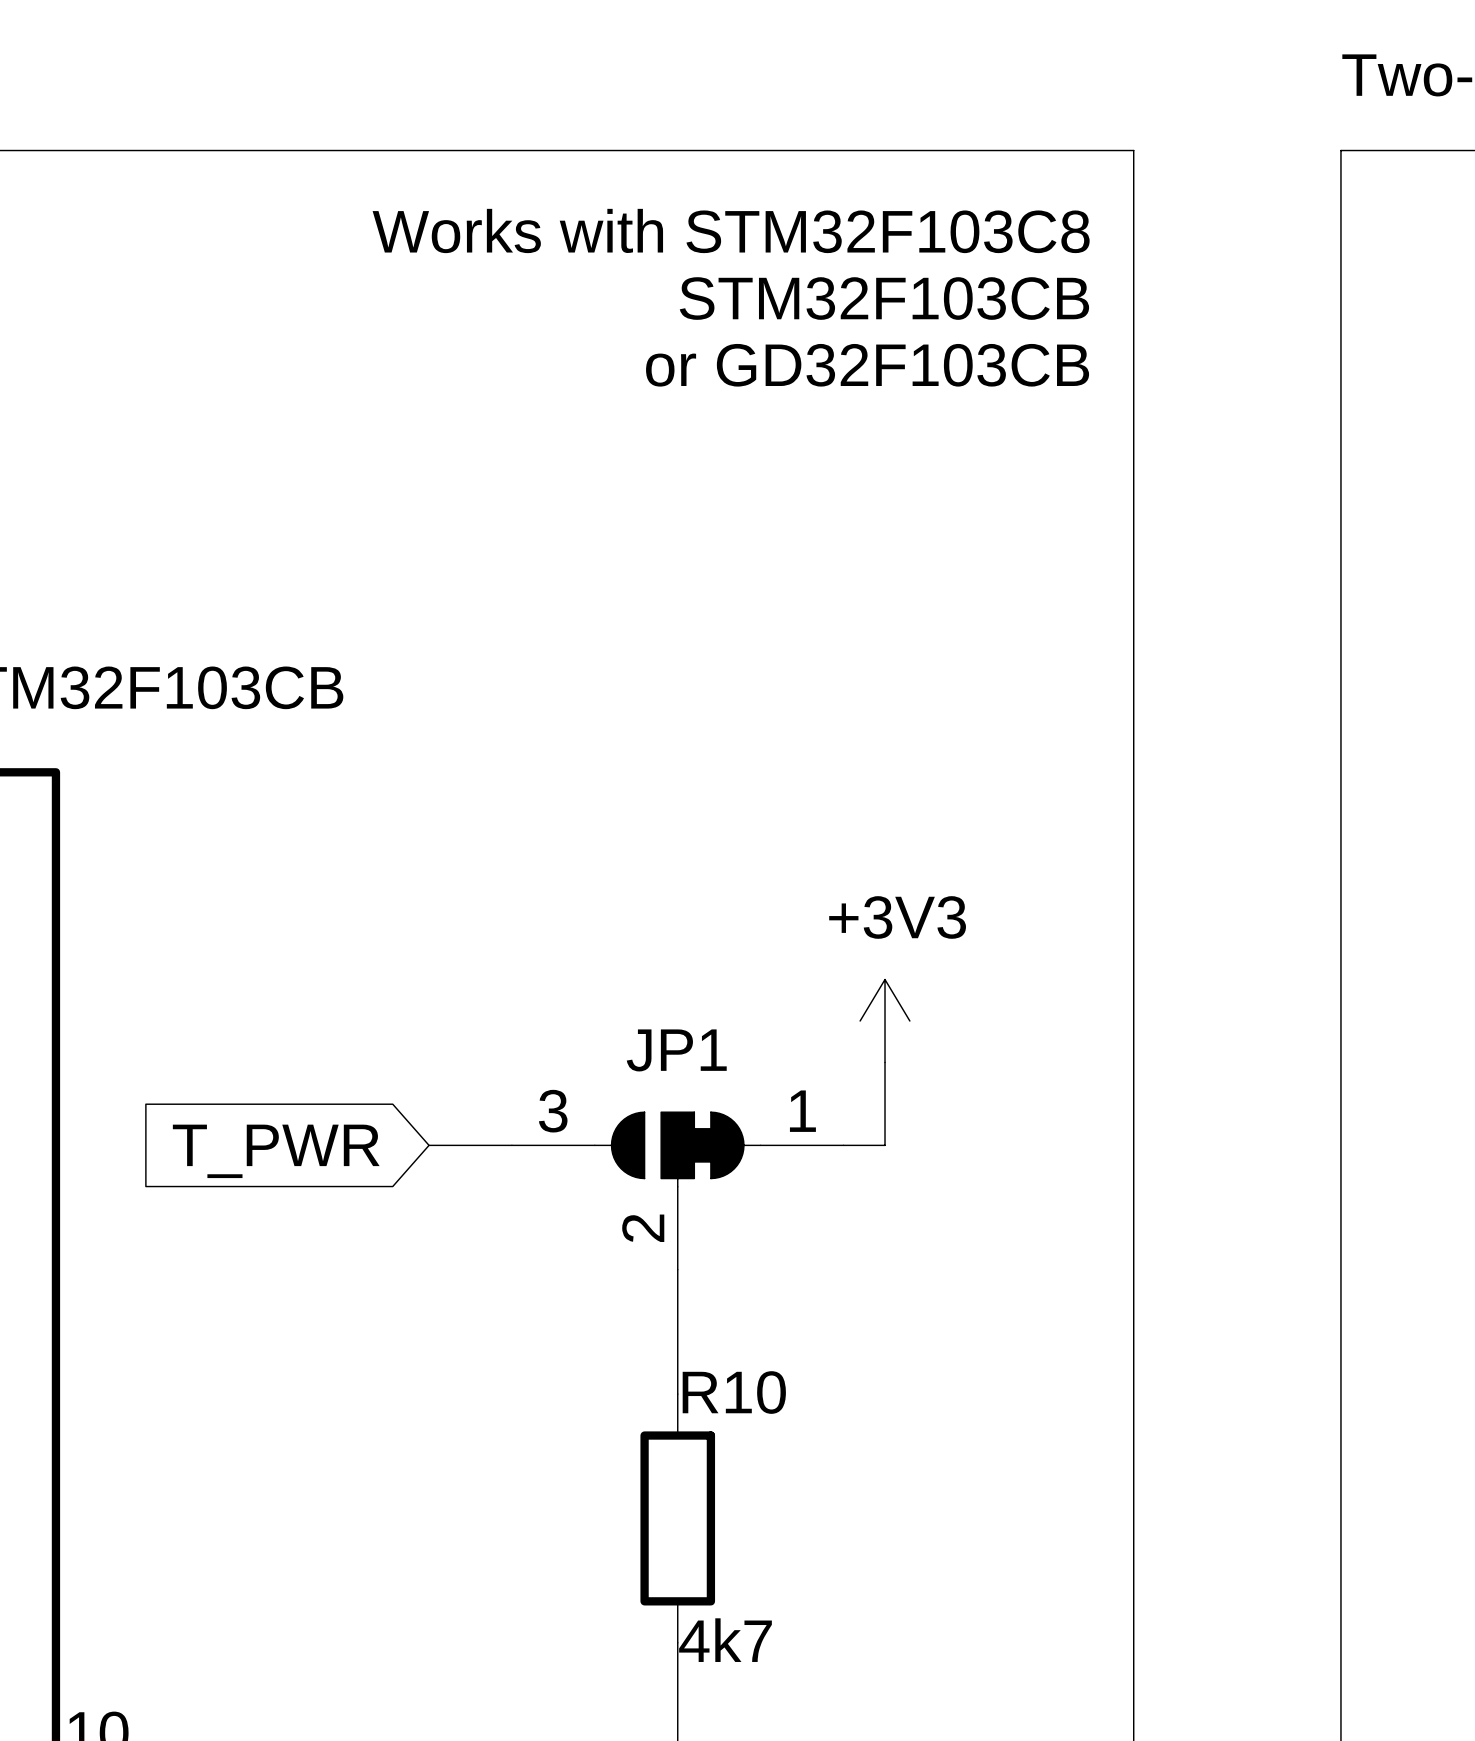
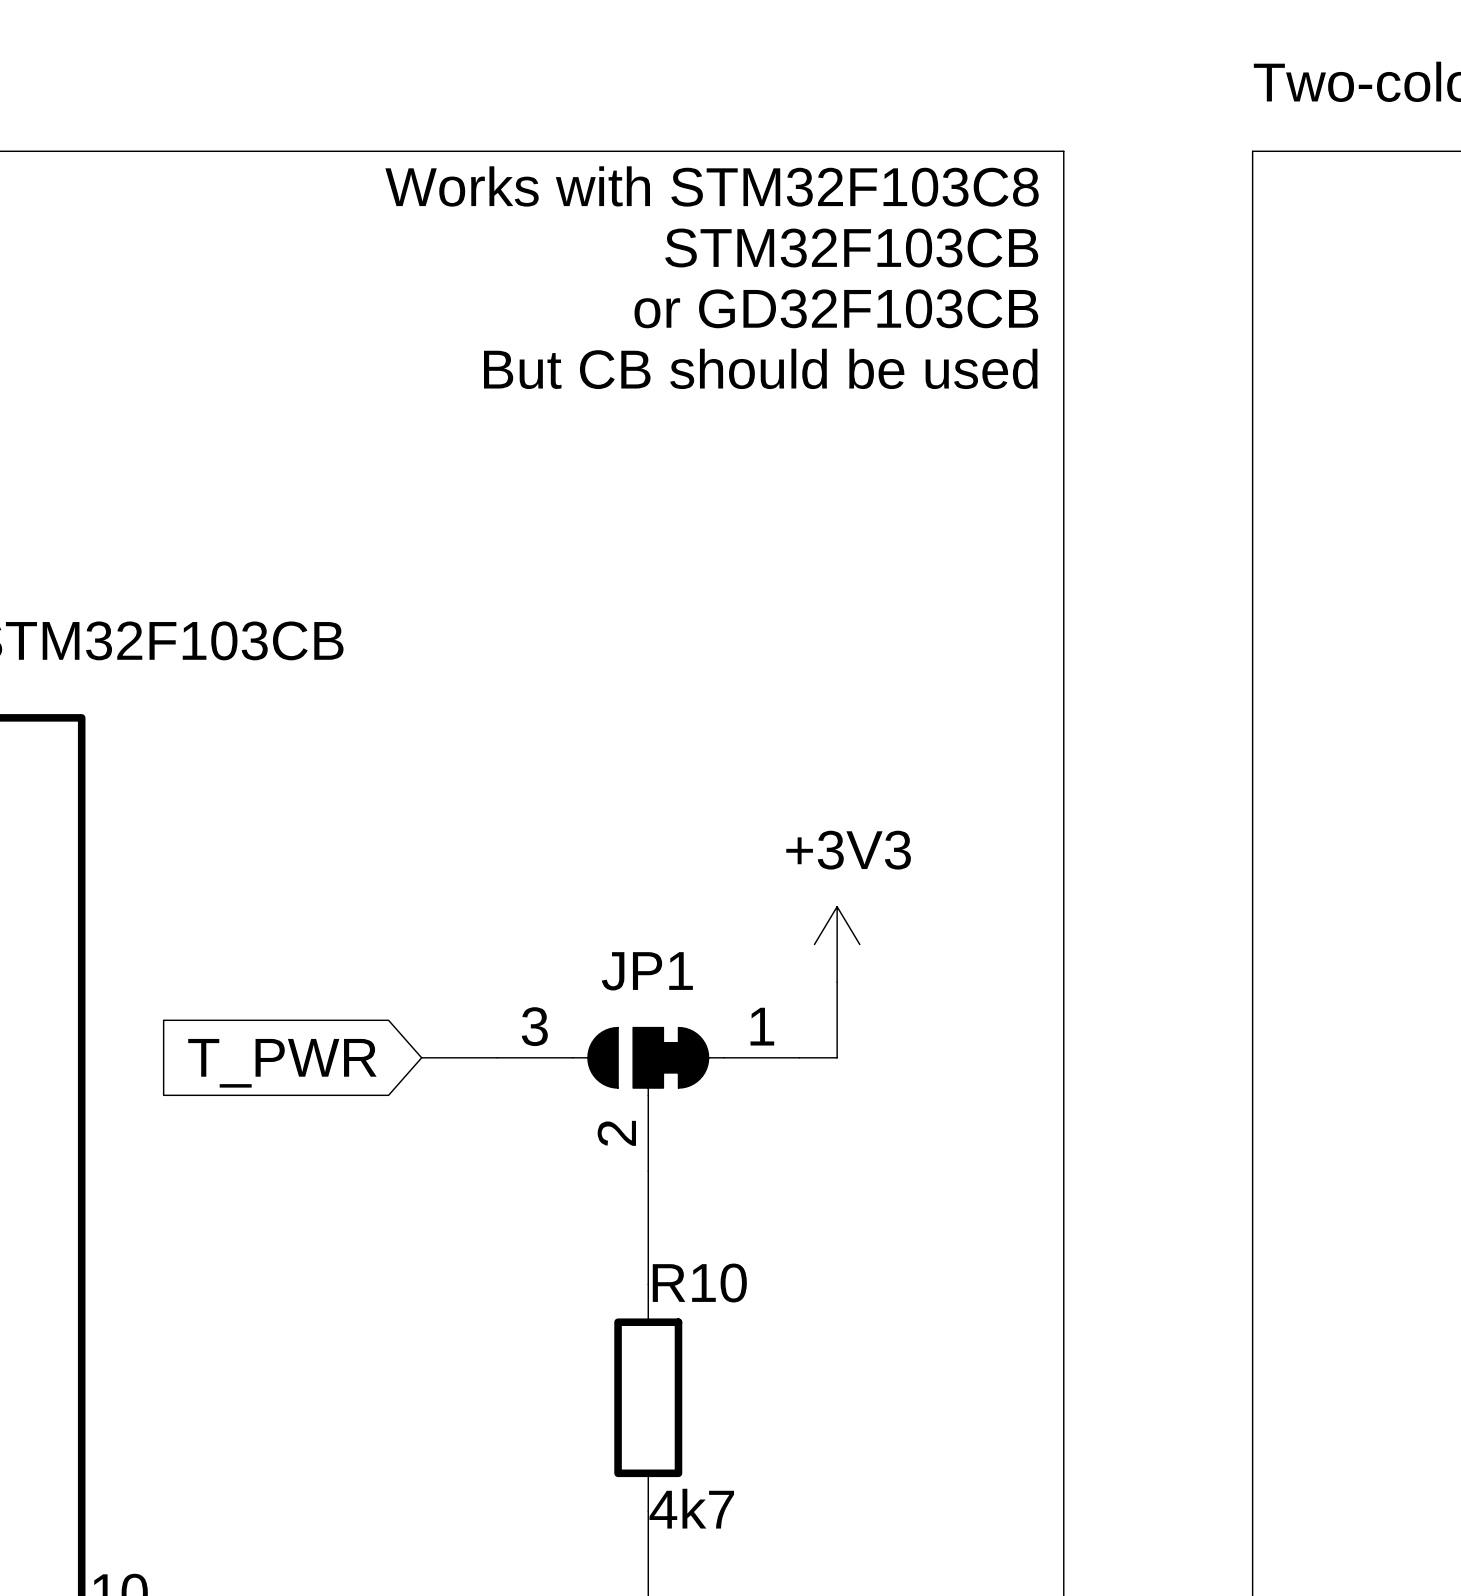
text position: Works with STM32F103C8 (731, 230) -> Works with STM32F103C8 (712, 186)
text position: STM32F103CB (884, 298) -> STM32F103CB (851, 248)
text position: or GD32F103CB (867, 365) -> or GD32F103CB (836, 308)
text: none -> But CB should be used (760, 368)

